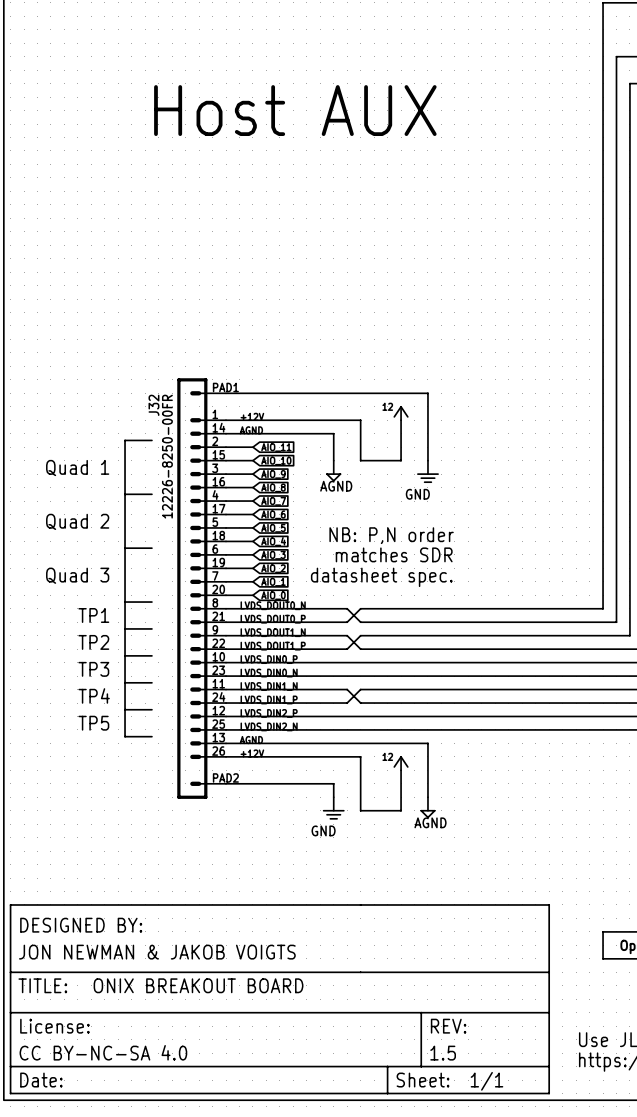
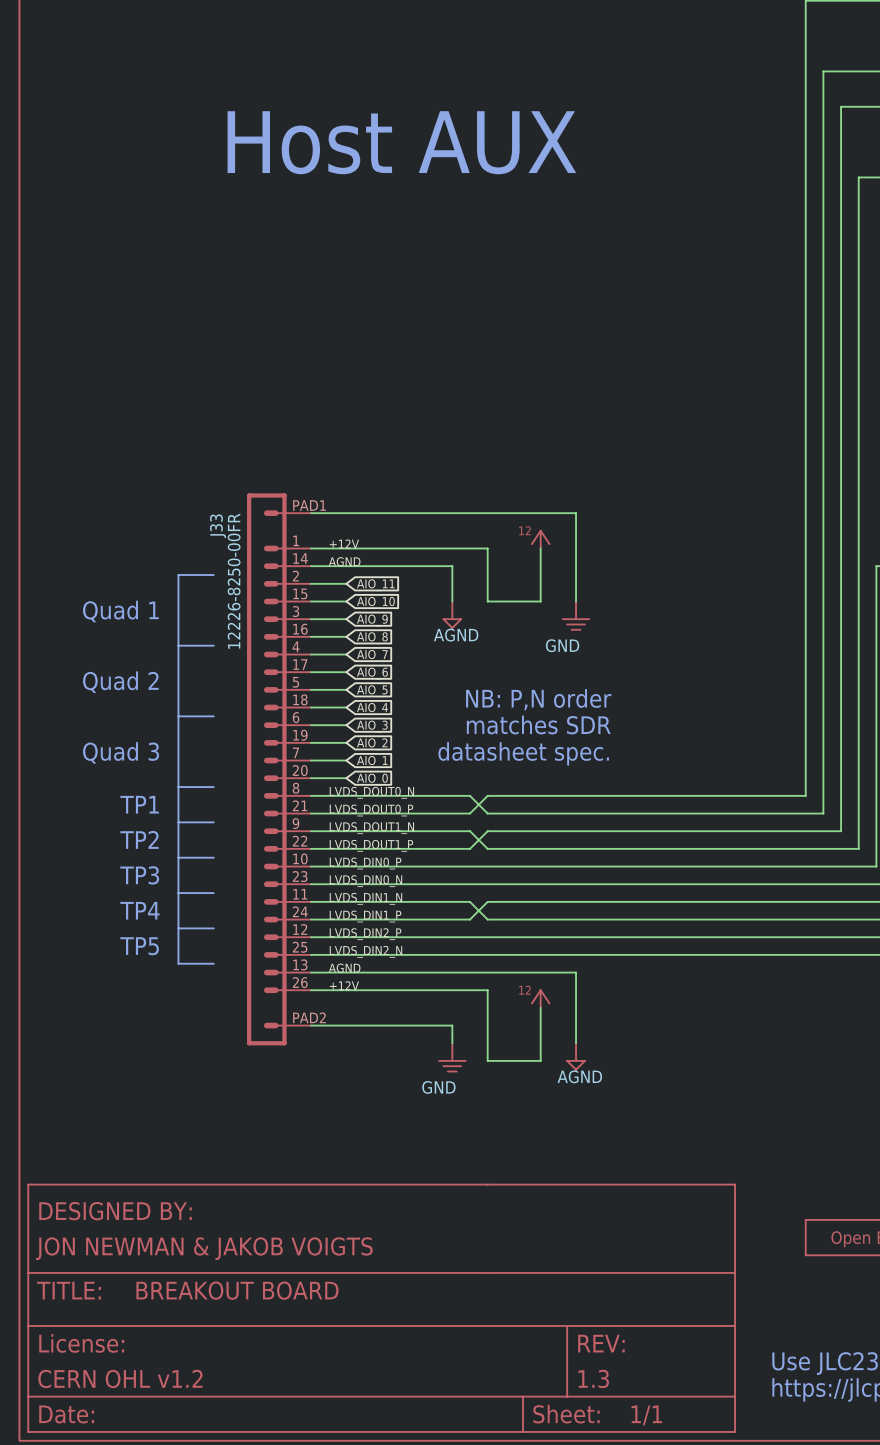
J32 name: J32 (153, 405) -> J33 (218, 526)
part text: ONIX BREAKOUT BOARD (198, 985) -> BREAKOUT BOARD (237, 1290)
part text: CC BY-NC-SA 4.0 (103, 1052) -> CERN OHL v1.2 (120, 1378)
part text: 1.5 (443, 1053) -> 1.3 (593, 1378)

